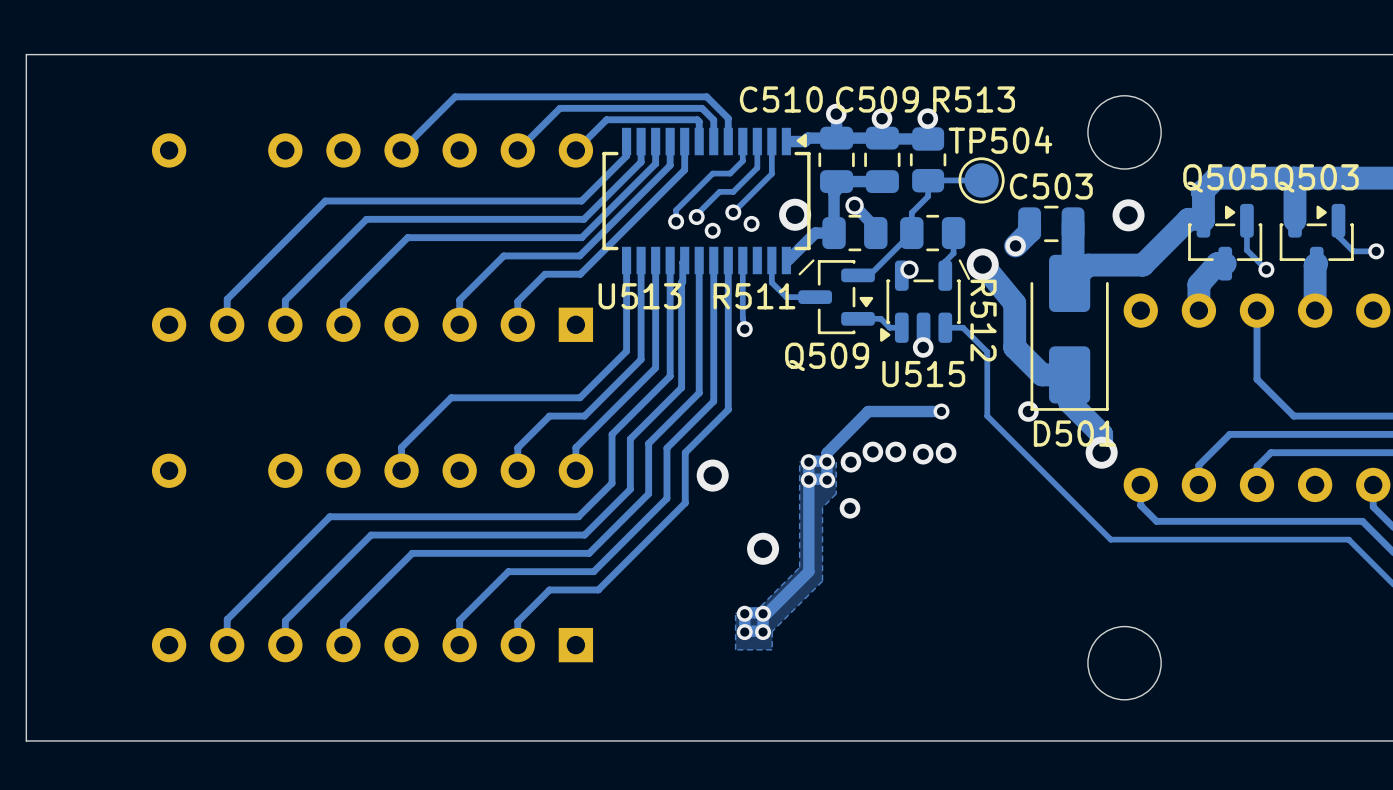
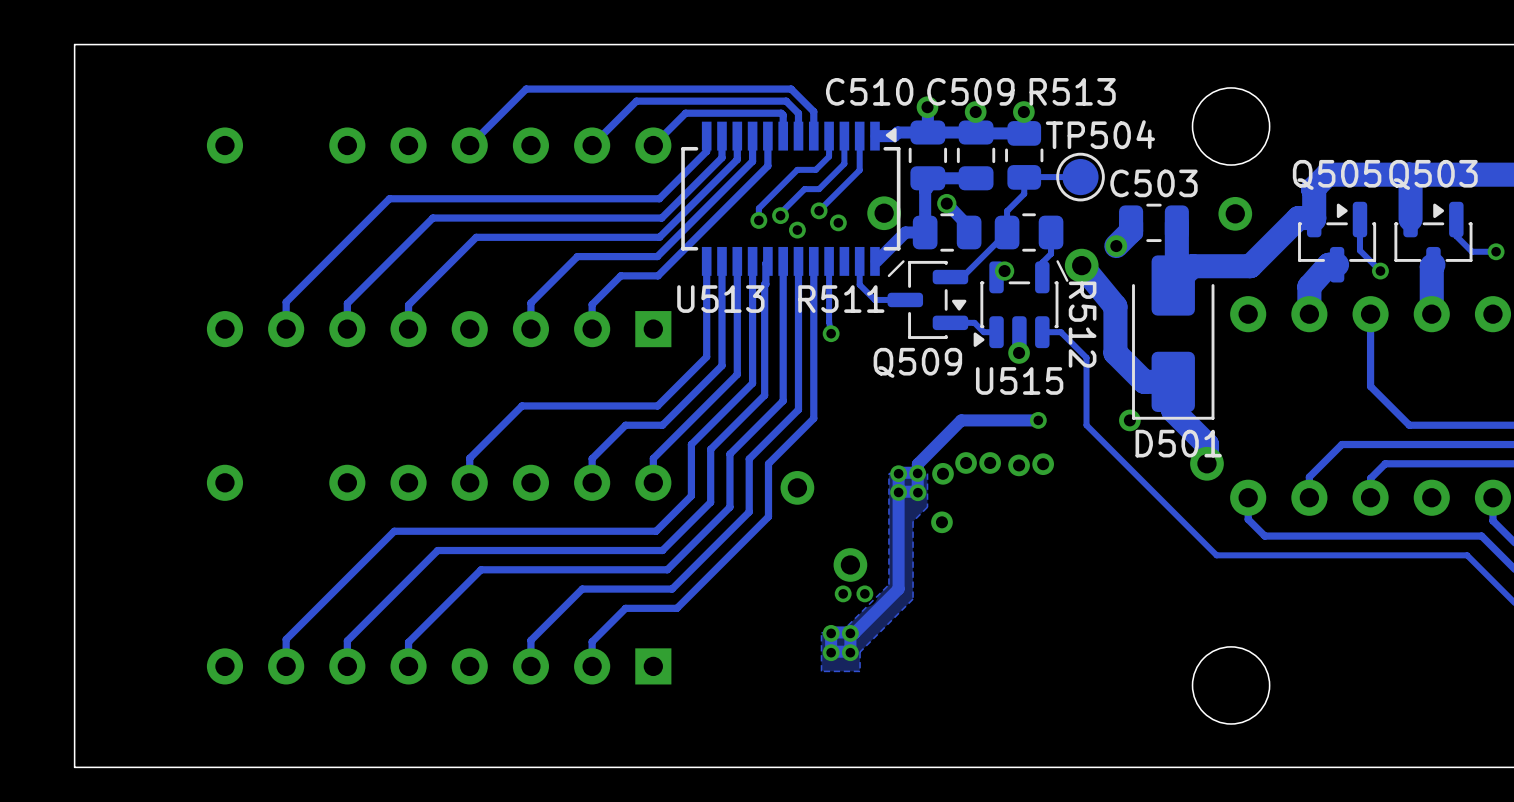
via: none -> (843, 593)
via: none -> (864, 593)

